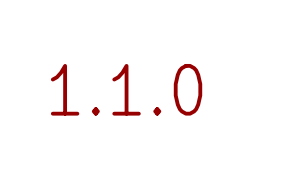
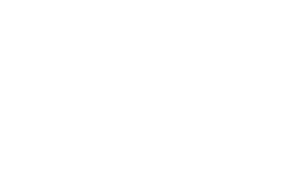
text: 1.1.0 (126, 89) -> none

